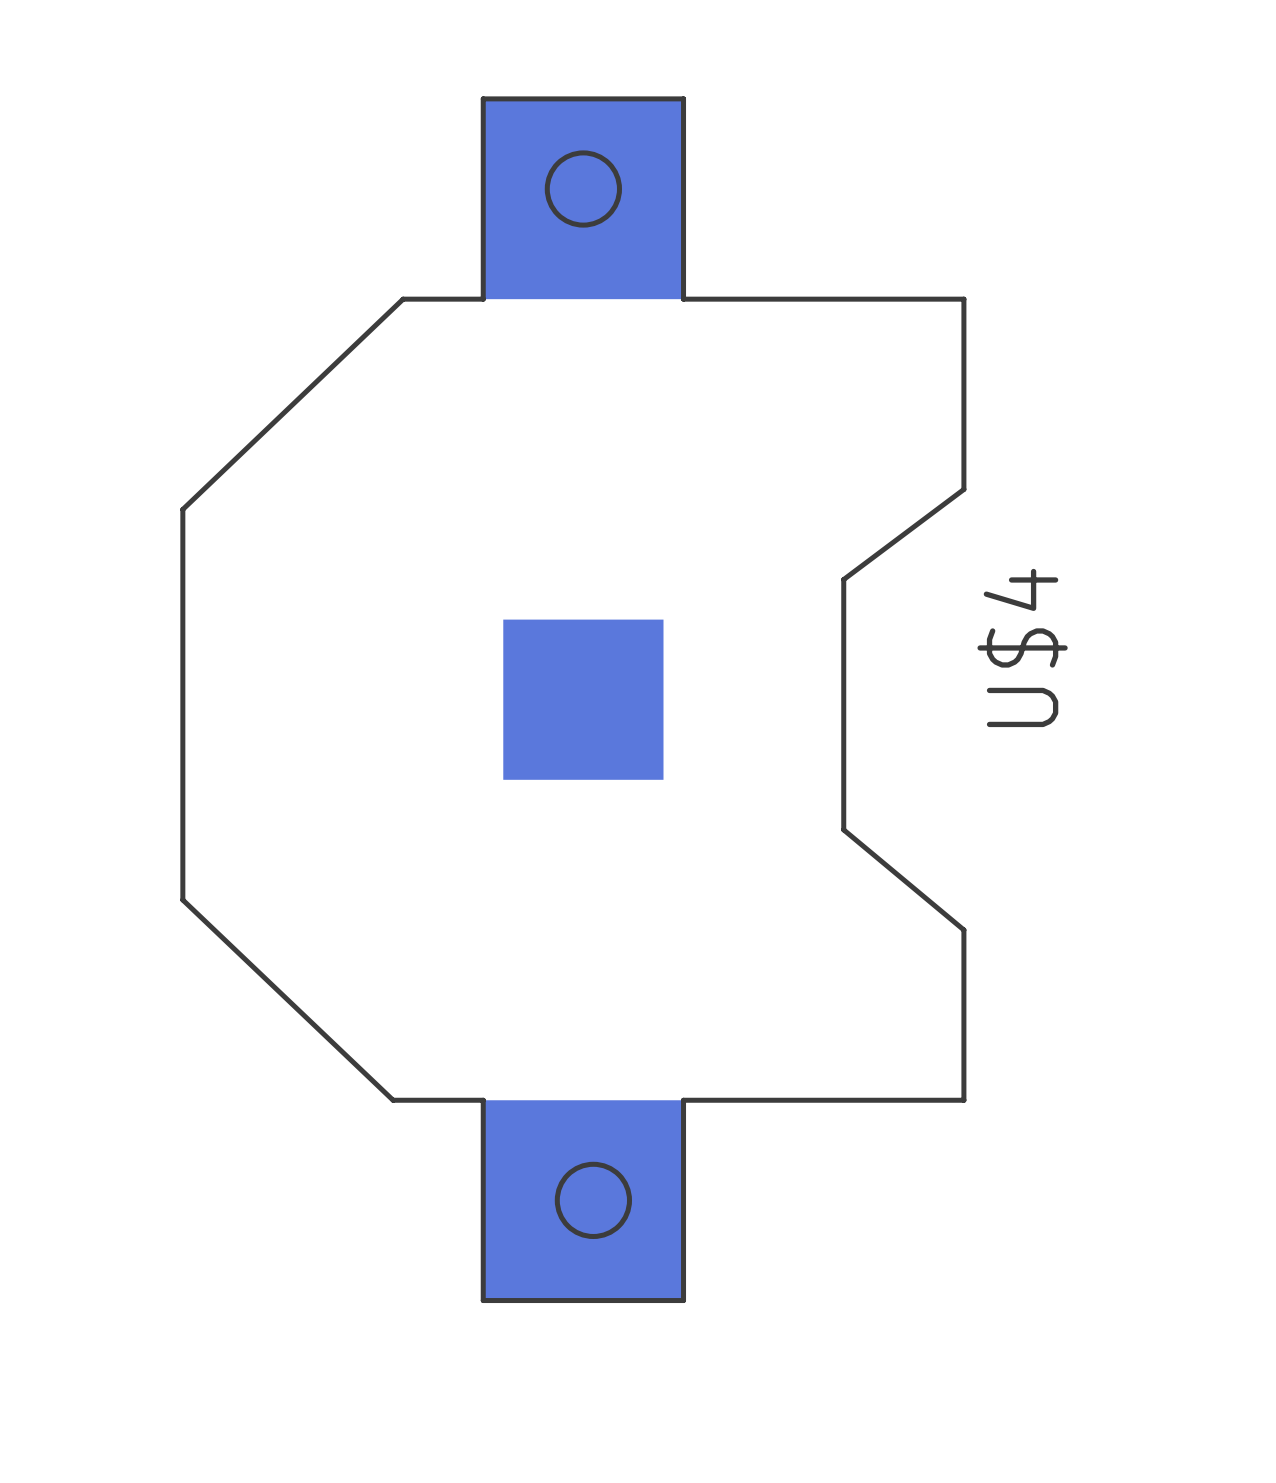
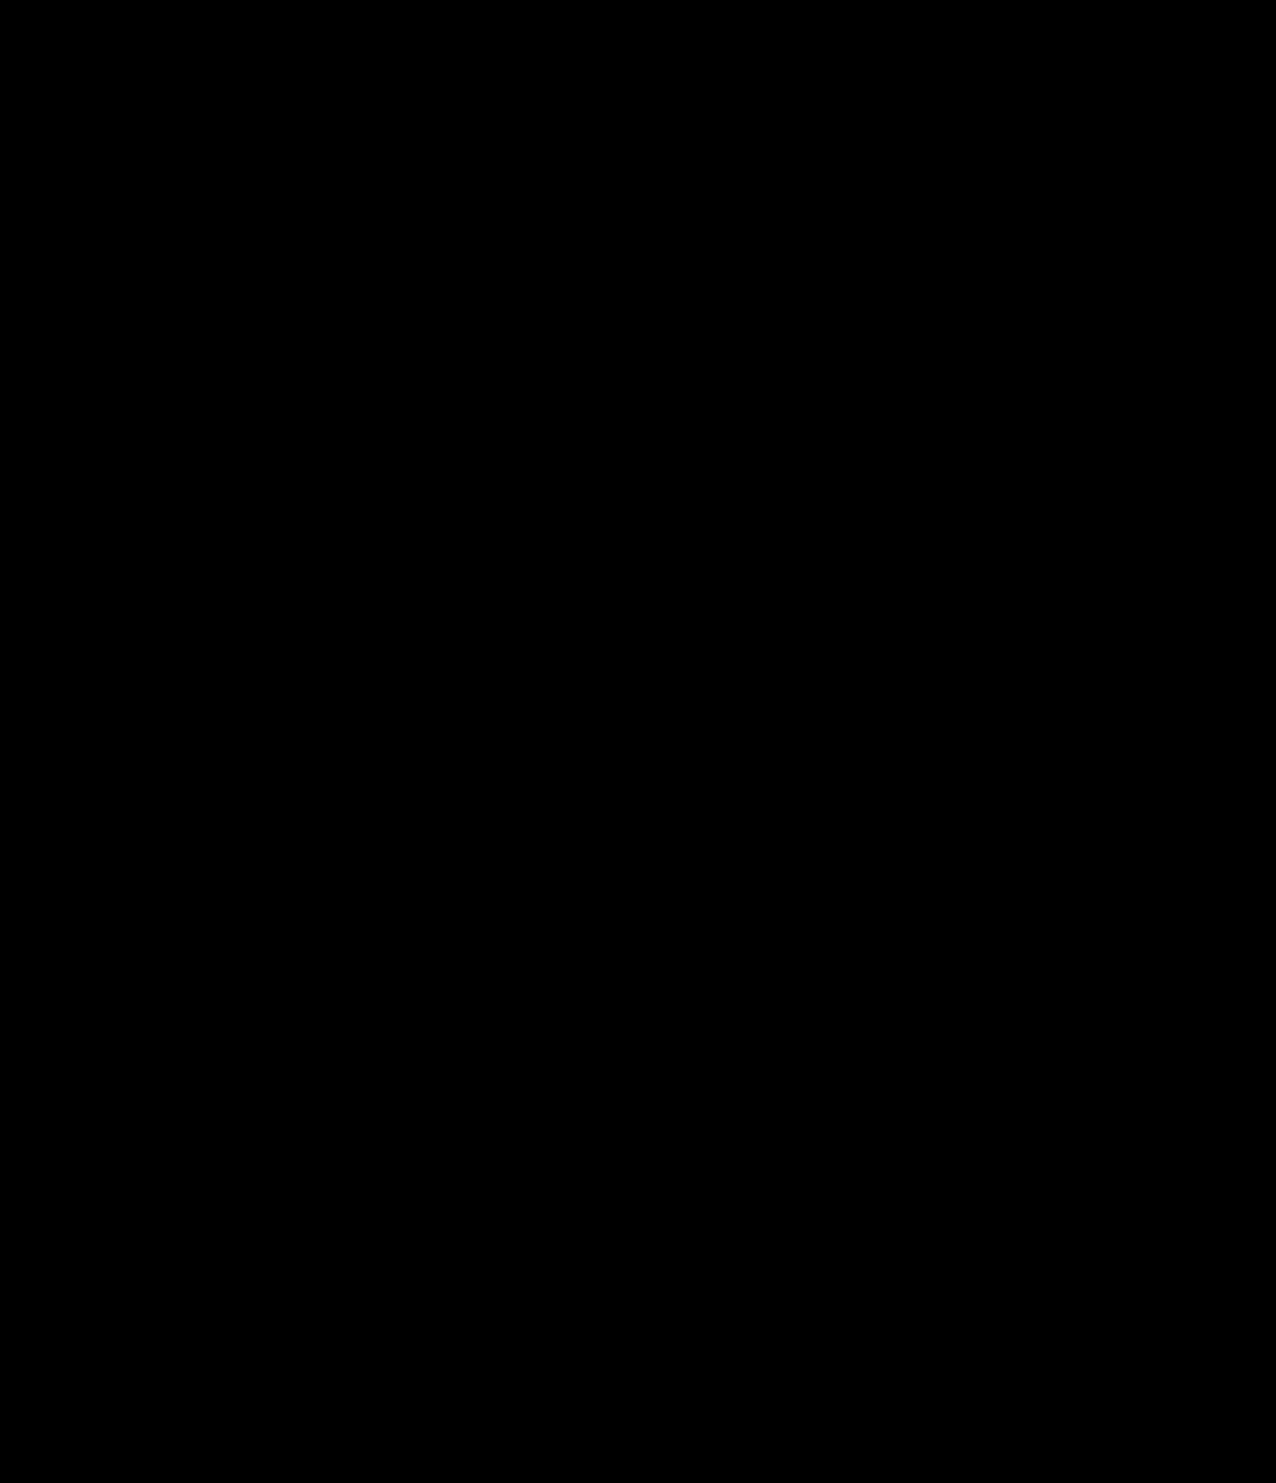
U$4: (573, 699) -> none

